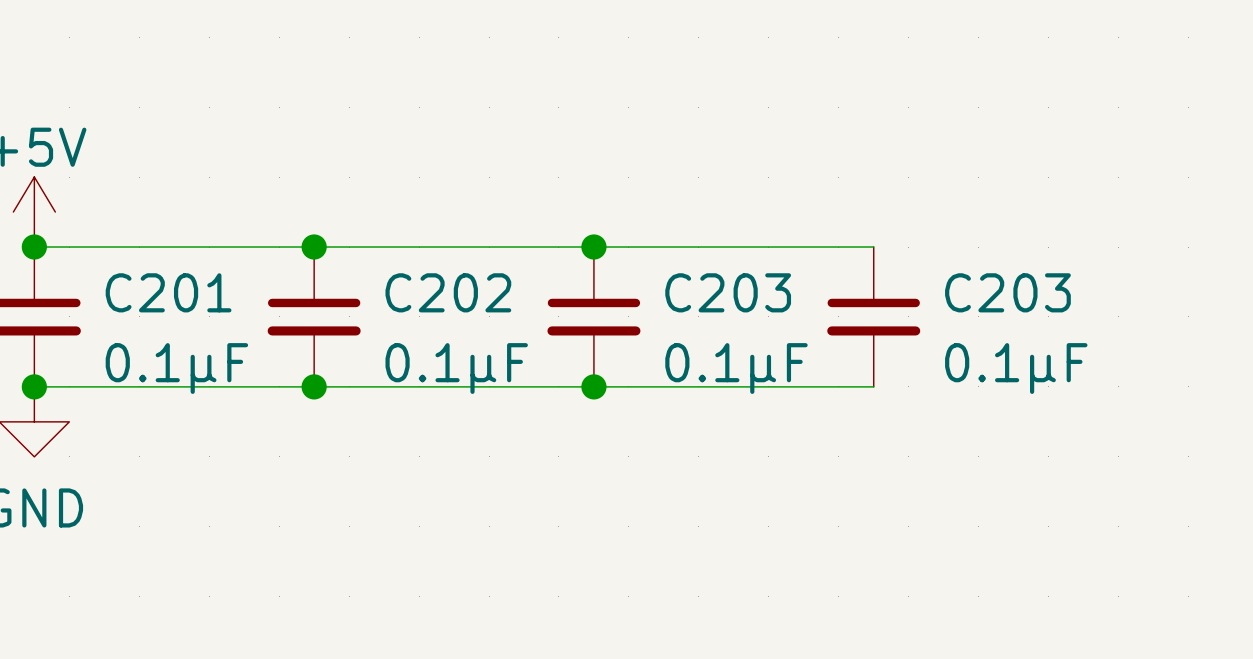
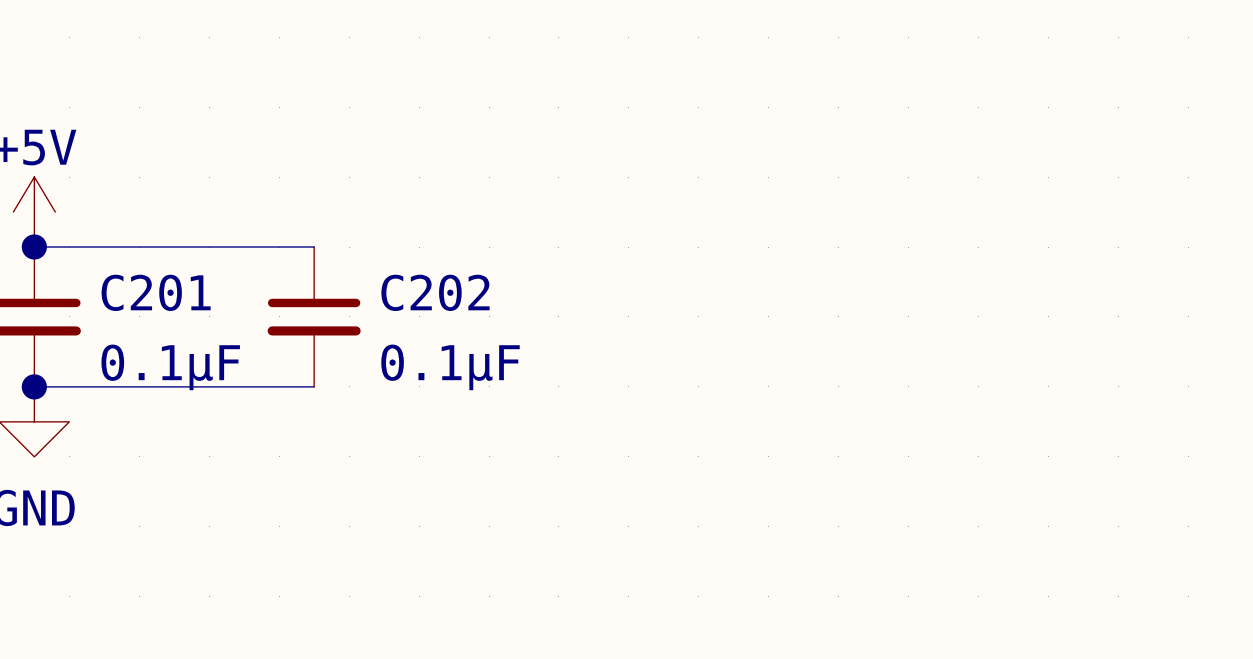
wire: (314, 247) (873, 247) -> none
junction: (314, 247) -> none
junction: (593, 247) -> none
C203: 0.1µF (593, 316) -> none
C203: 0.1µF (873, 316) -> none
wire: (314, 386) (873, 386) -> none
junction: (314, 386) -> none
junction: (593, 386) -> none

